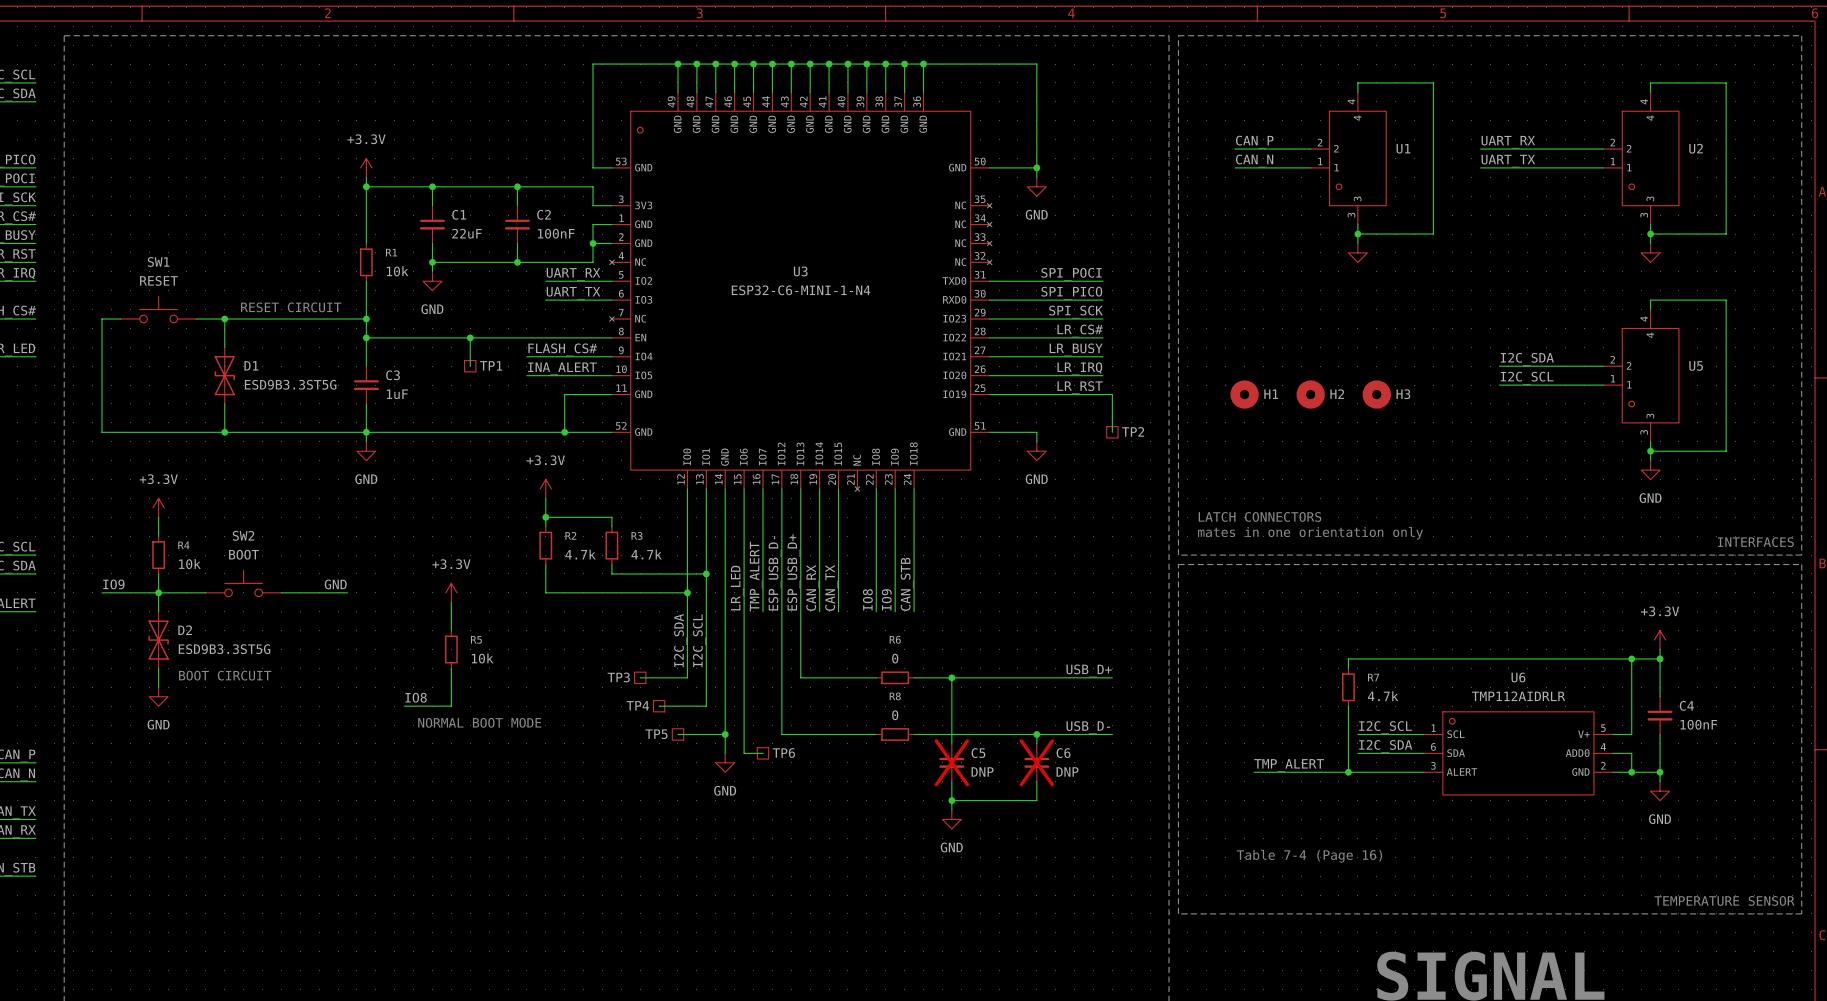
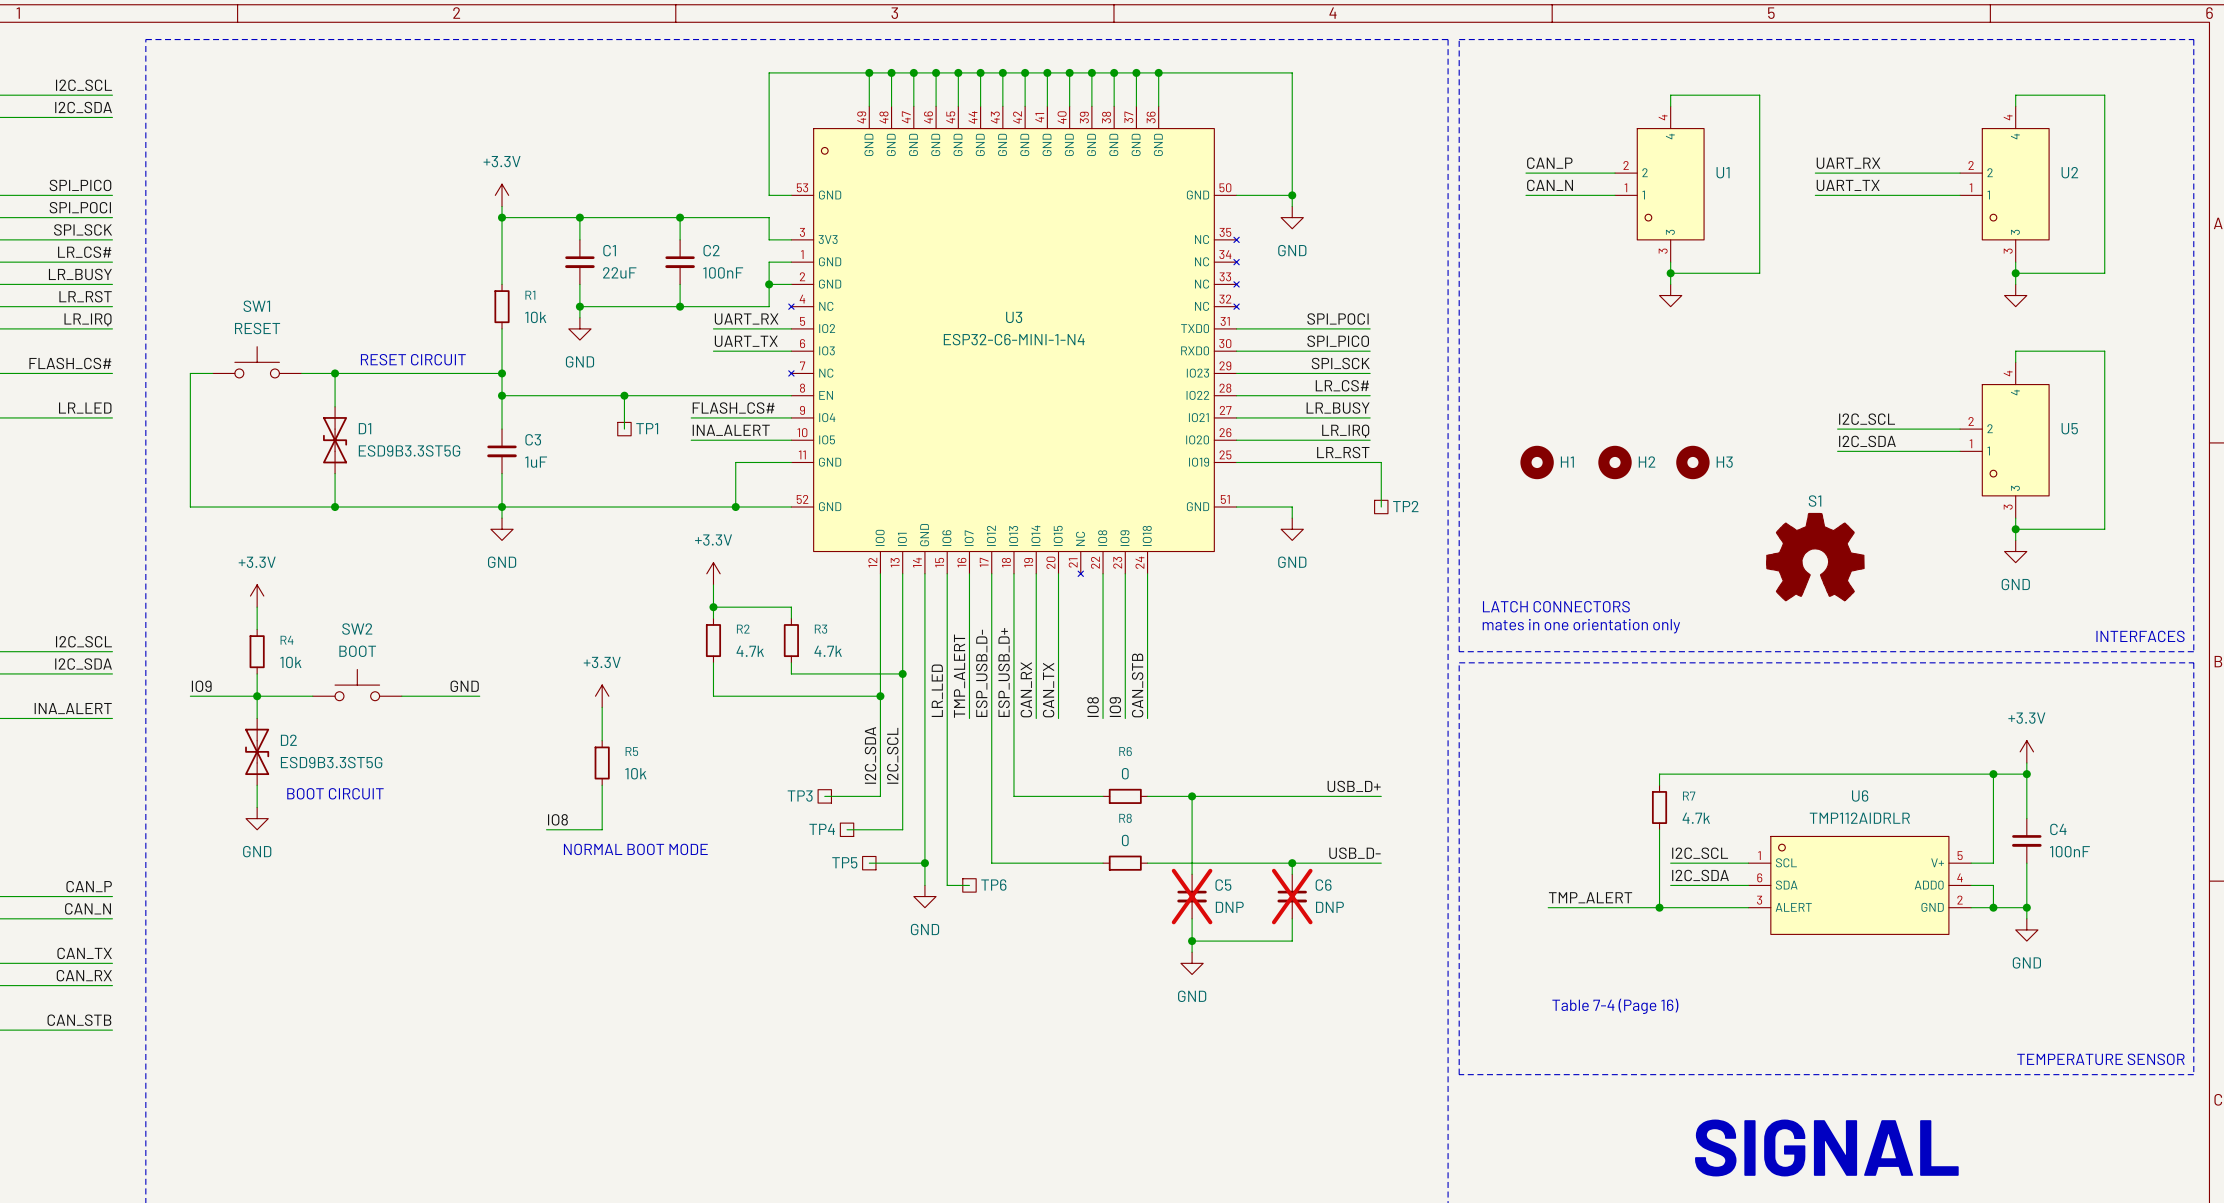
label: I2C_SDA (1527, 359) -> I2C_SCL (1867, 419)
label: I2C_SCL (1527, 378) -> I2C_SDA (1867, 441)
S1: none -> (1815, 557)

